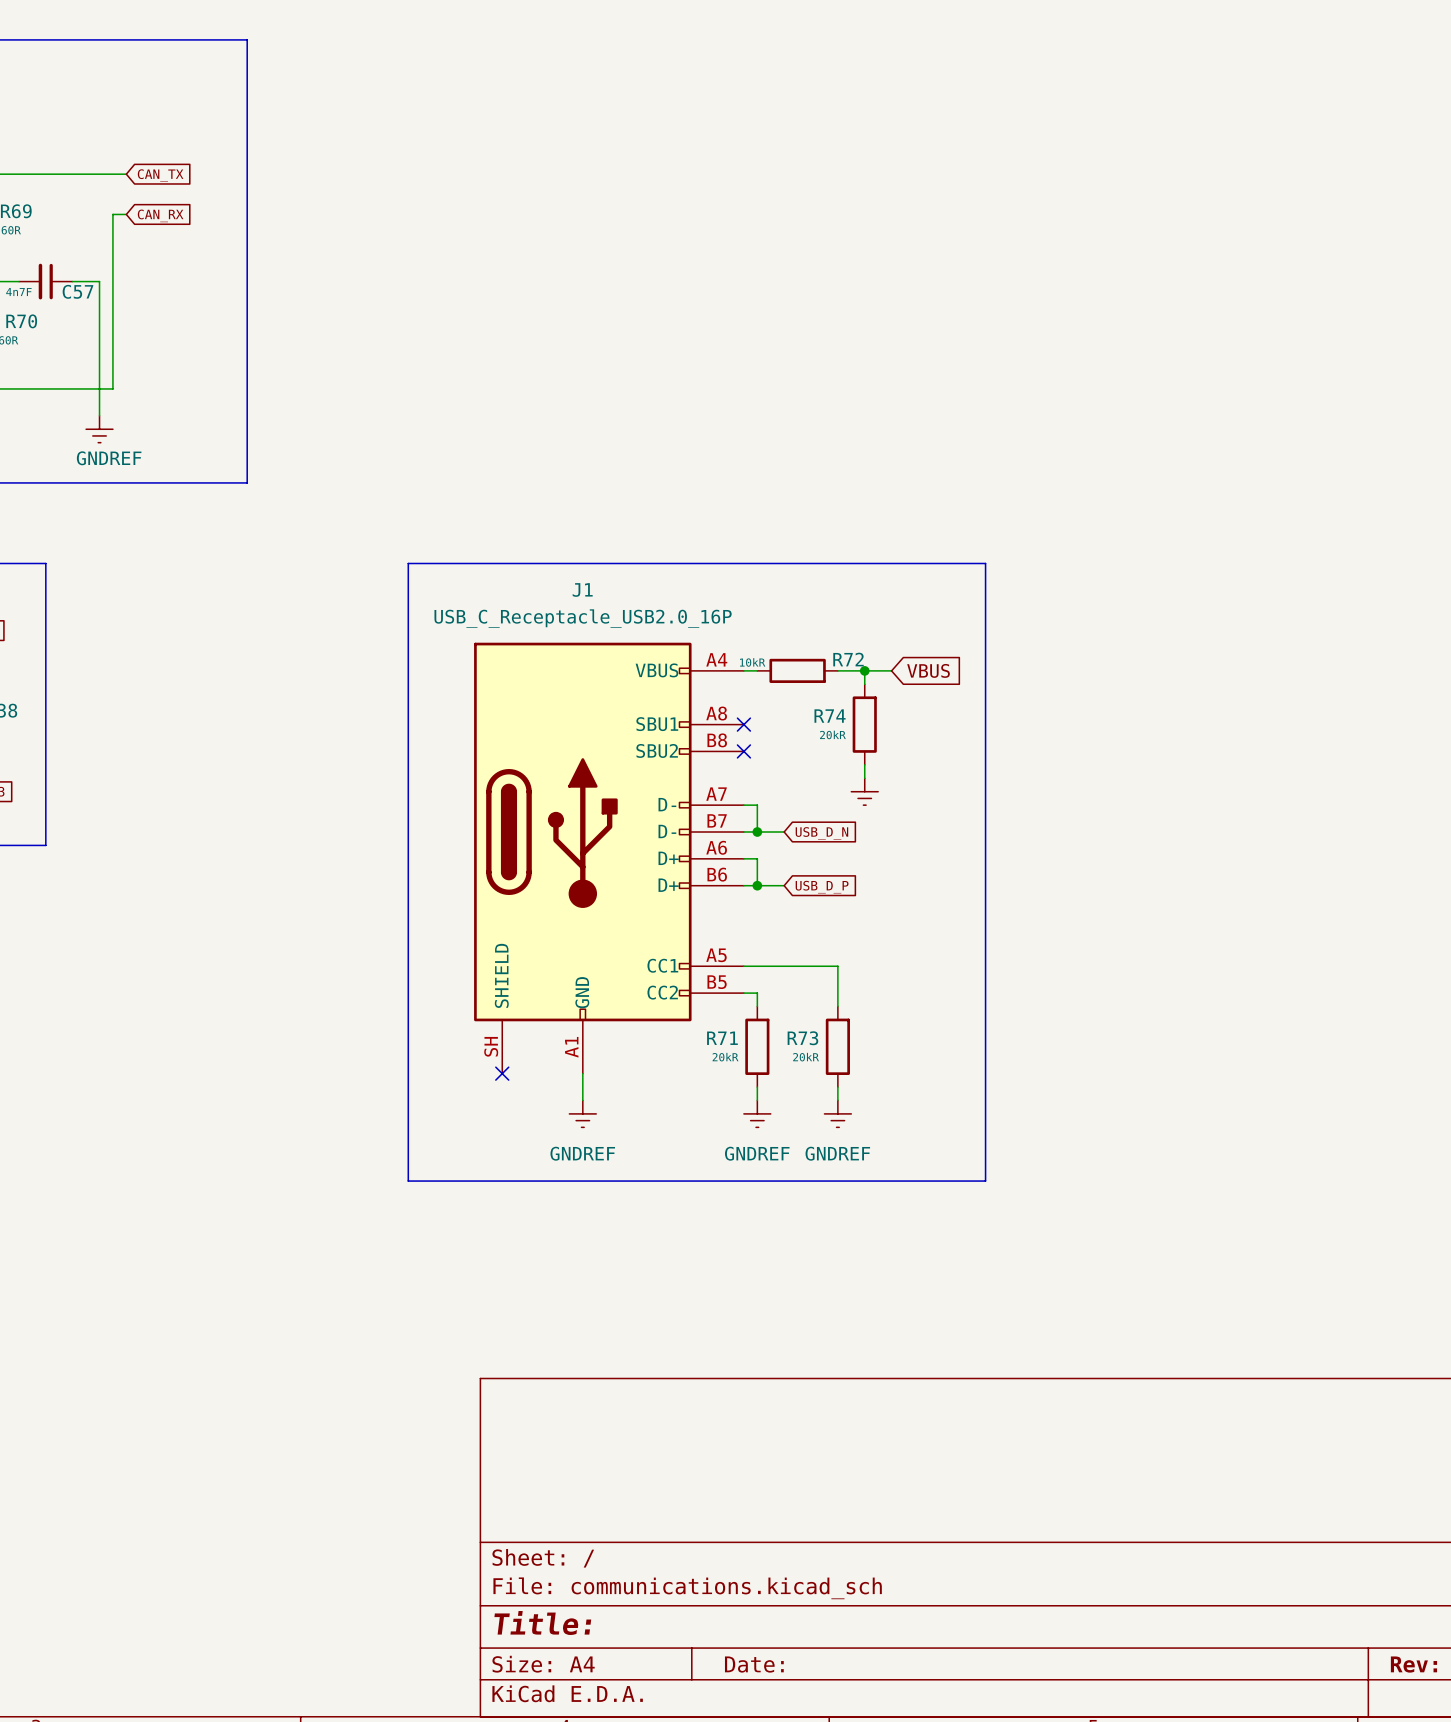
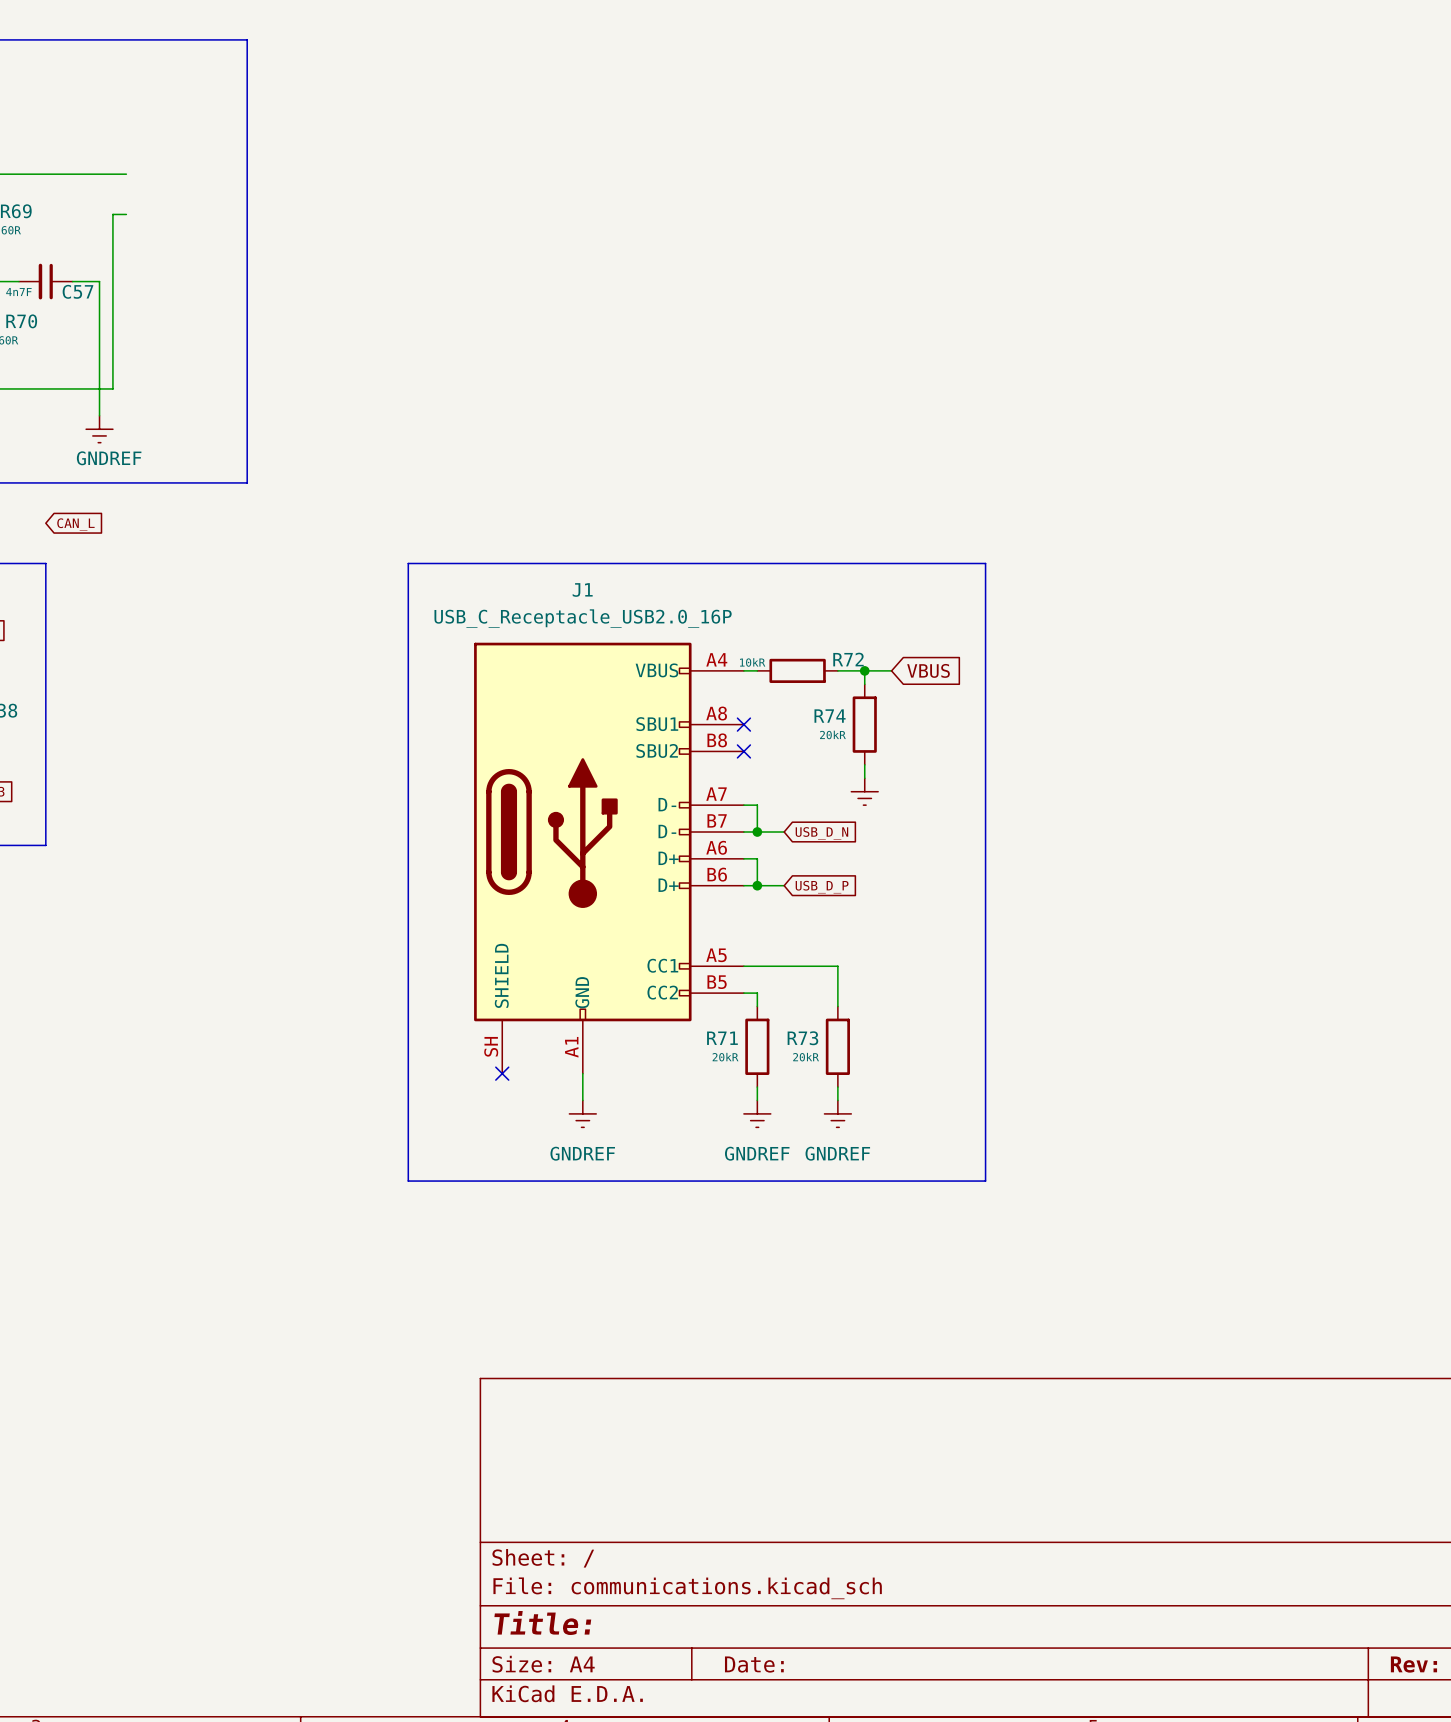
global label: CAN_TX (160, 175) -> none
global label: CAN_RX (160, 215) -> none
global label: none -> CAN_L (75, 524)

